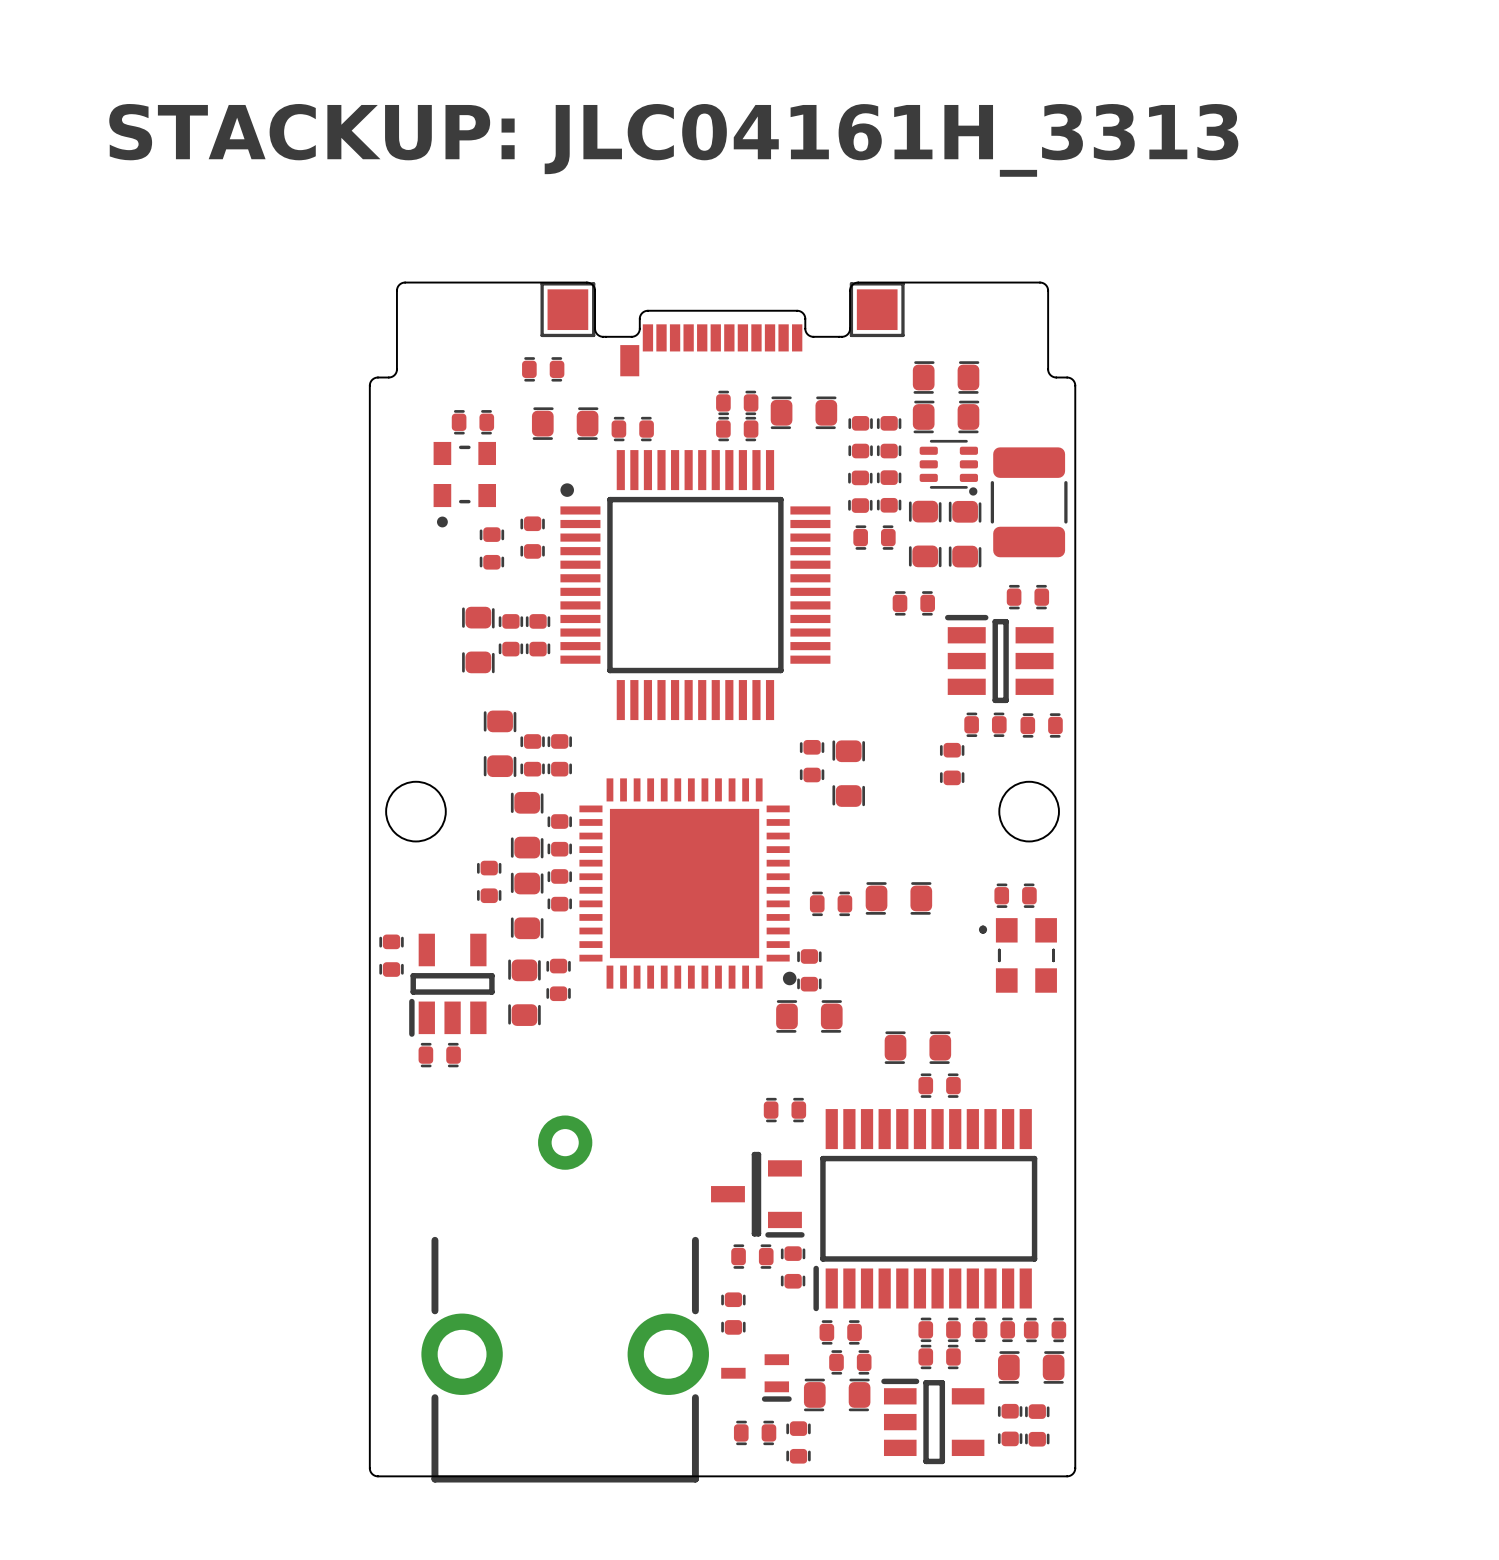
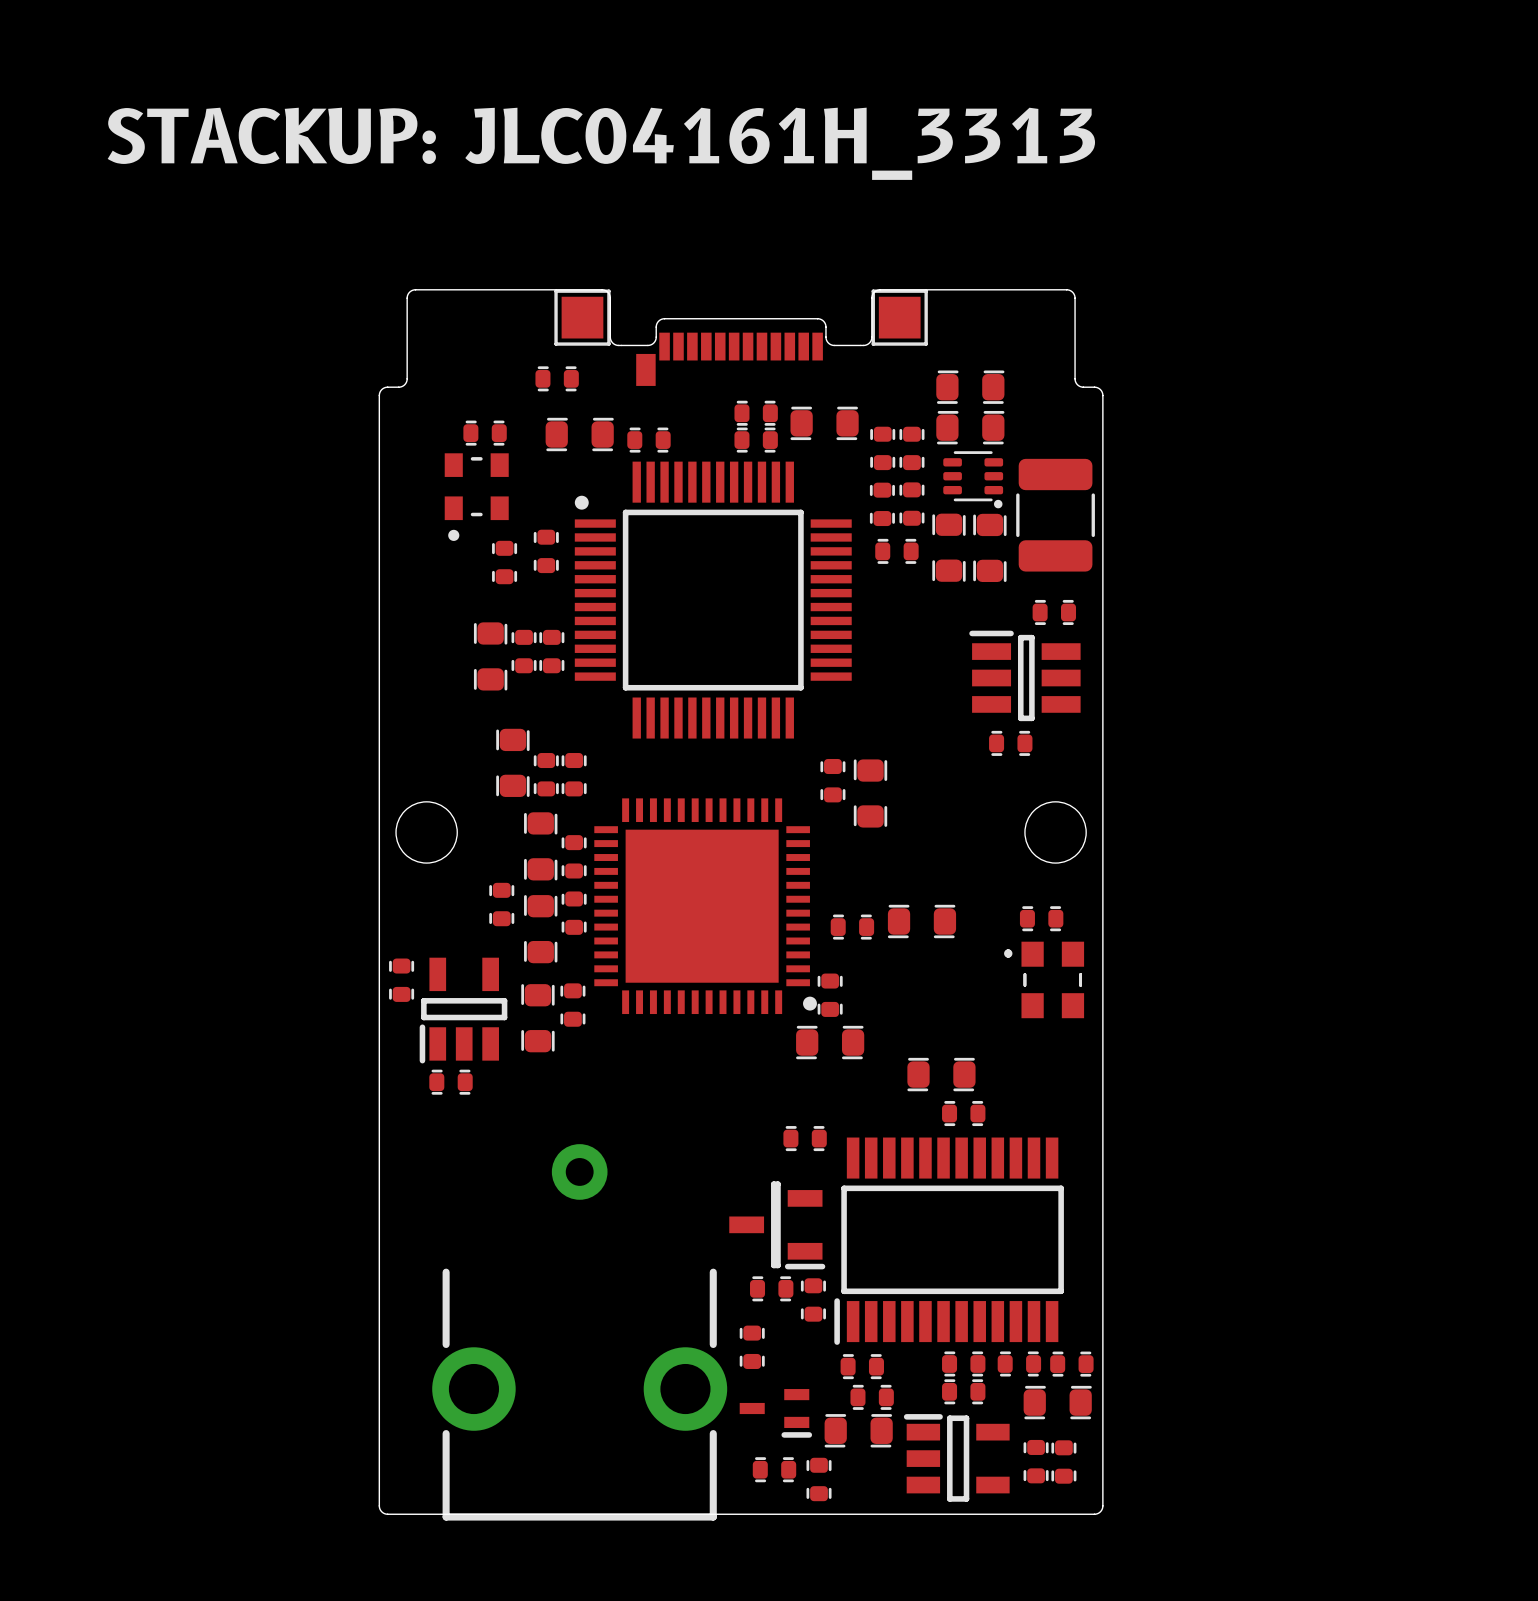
part: (913, 603) -> none
part: (1041, 725) -> none
part: (952, 764) -> none

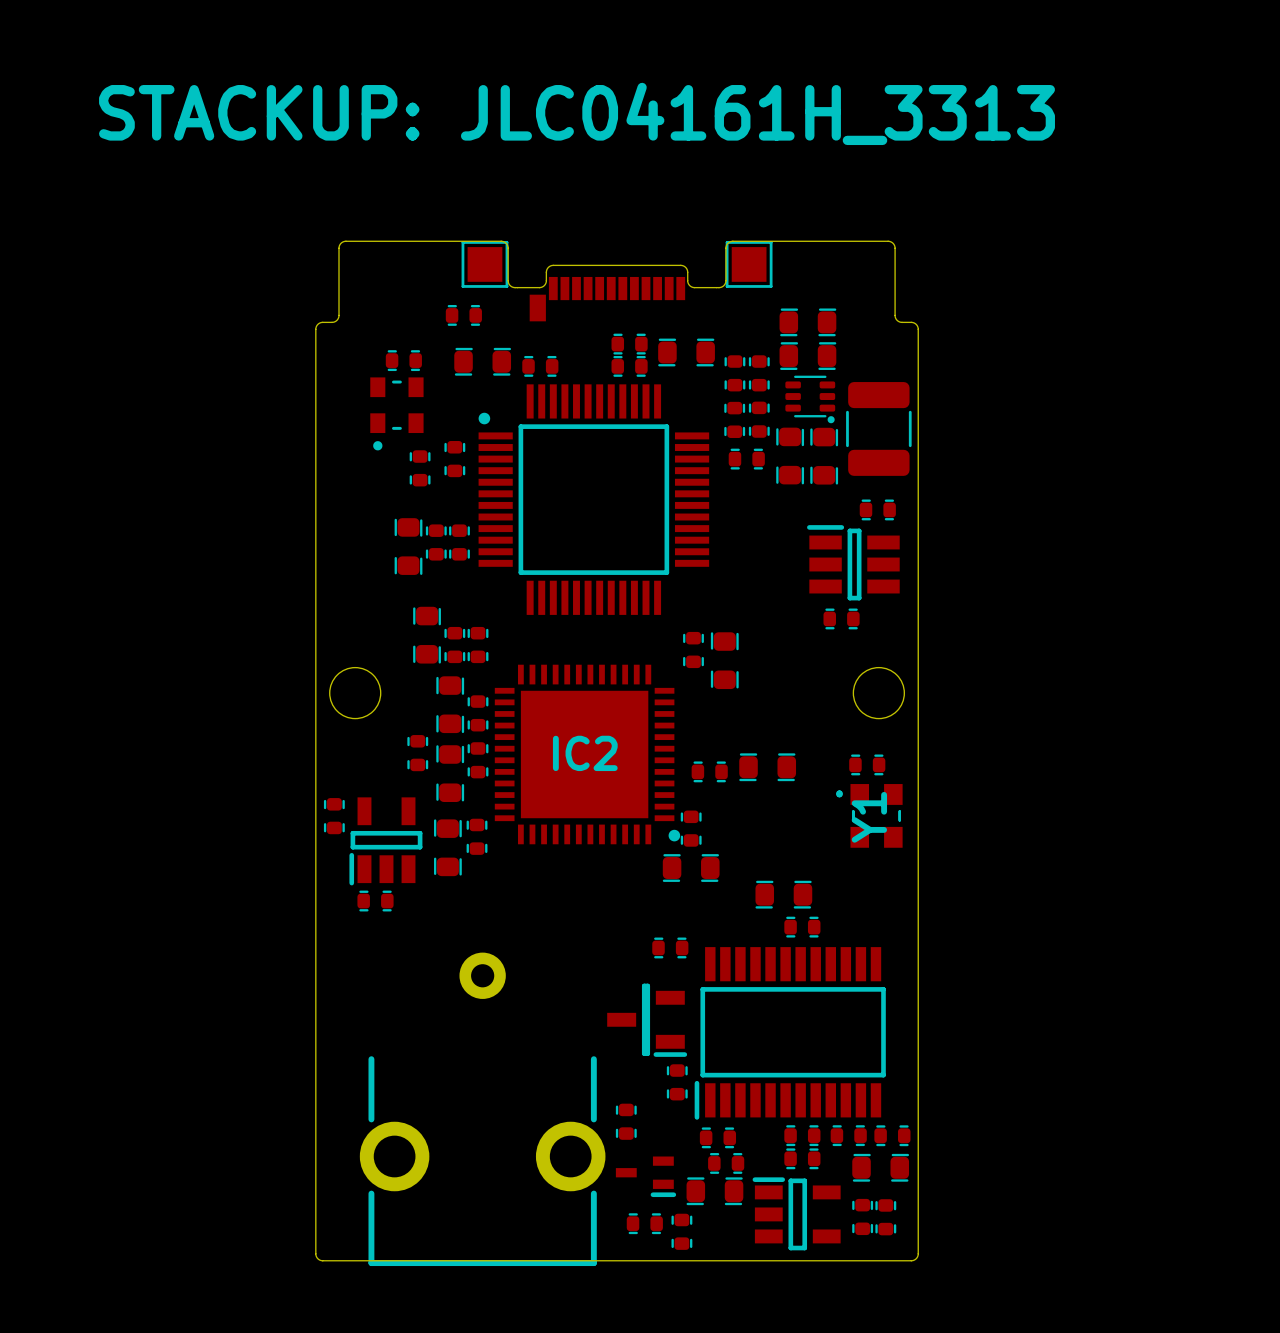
IC2 name: none -> IC2 (585, 753)
Y1 name: none -> Y1 (869, 817)
part: (771, 1288) -> none

